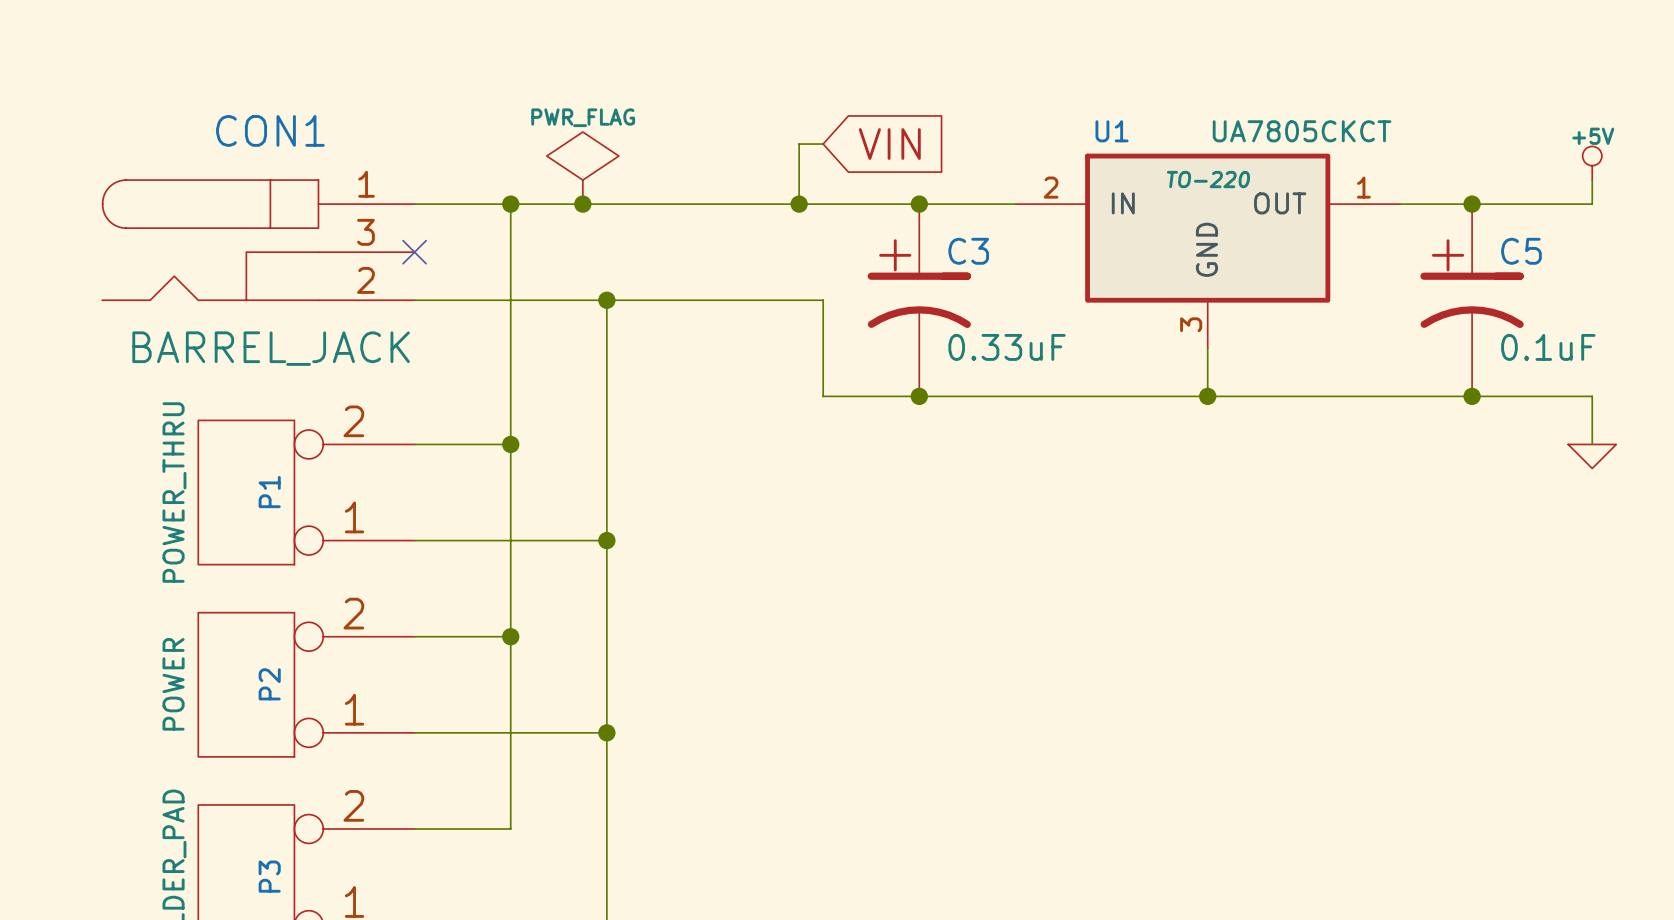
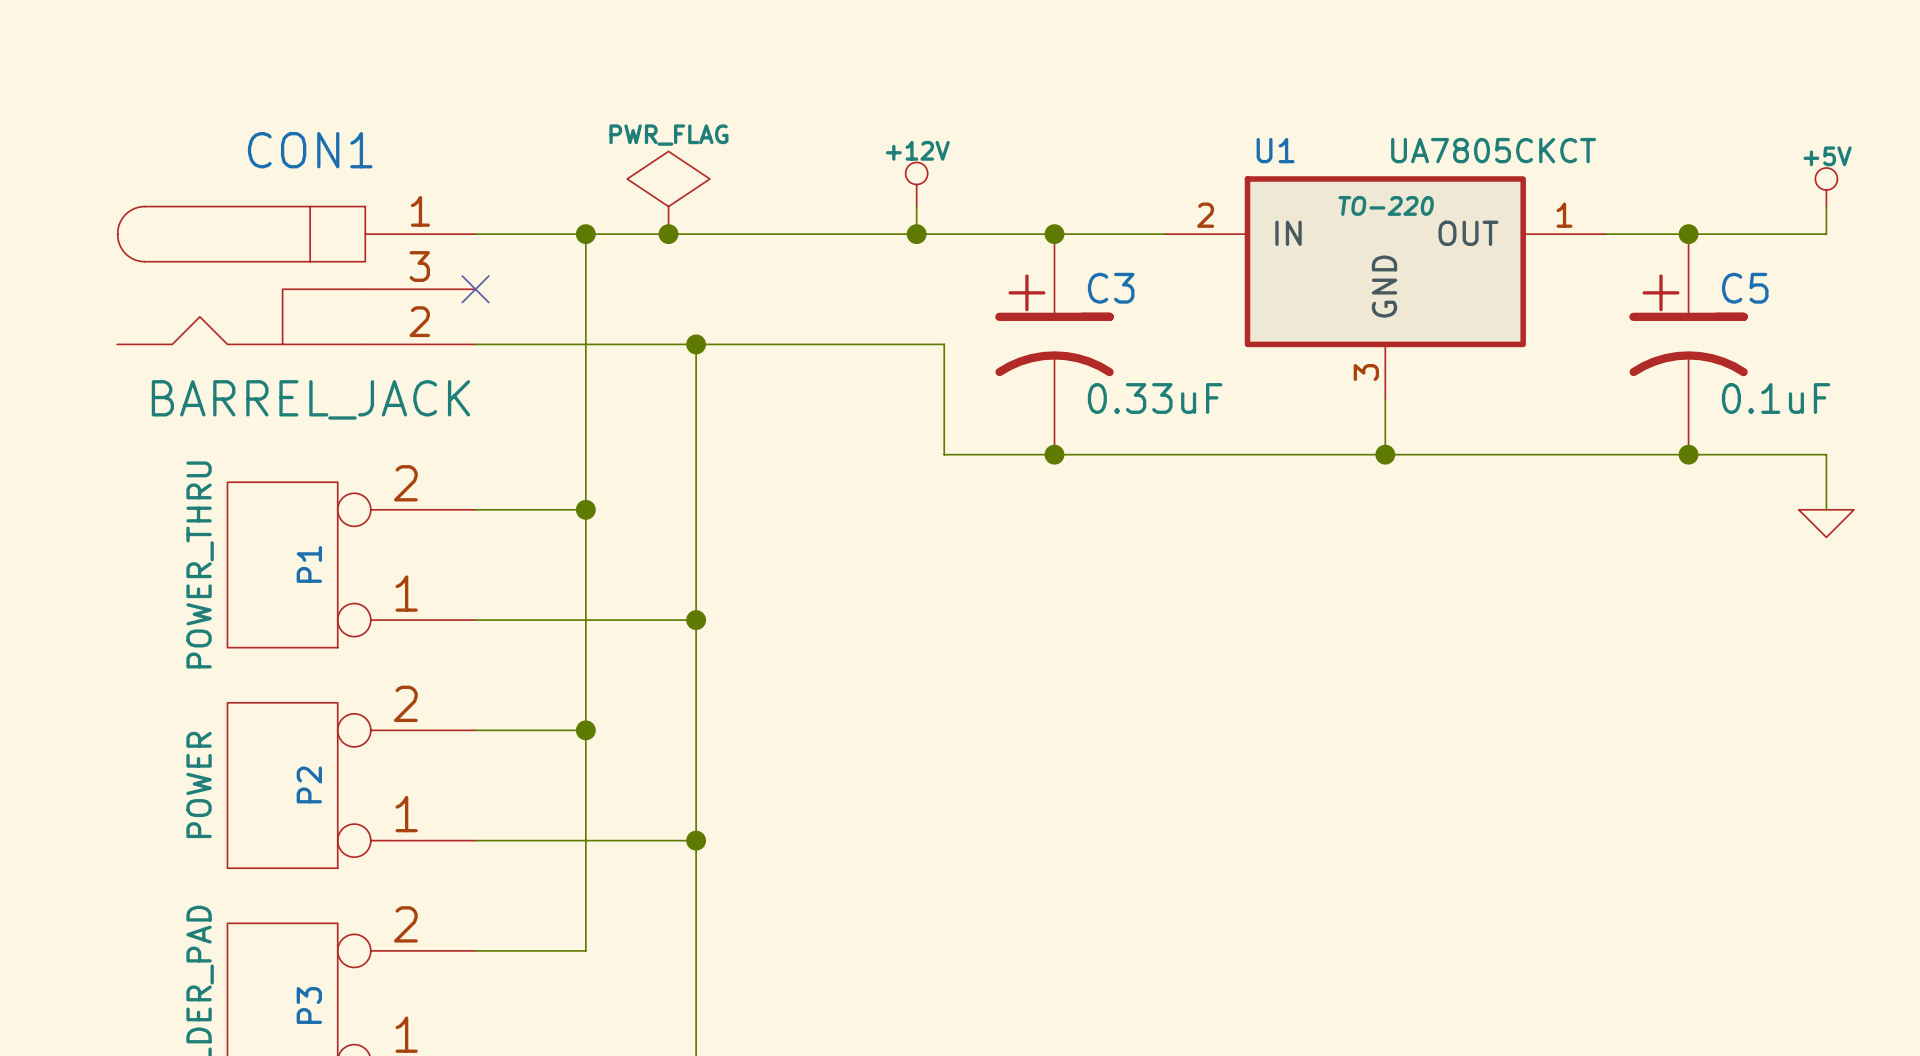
wire: (823, 144) (799, 144) (799, 180) -> none
global label: VIN (889, 144) -> none
power symbol: none -> +12V (916, 184)

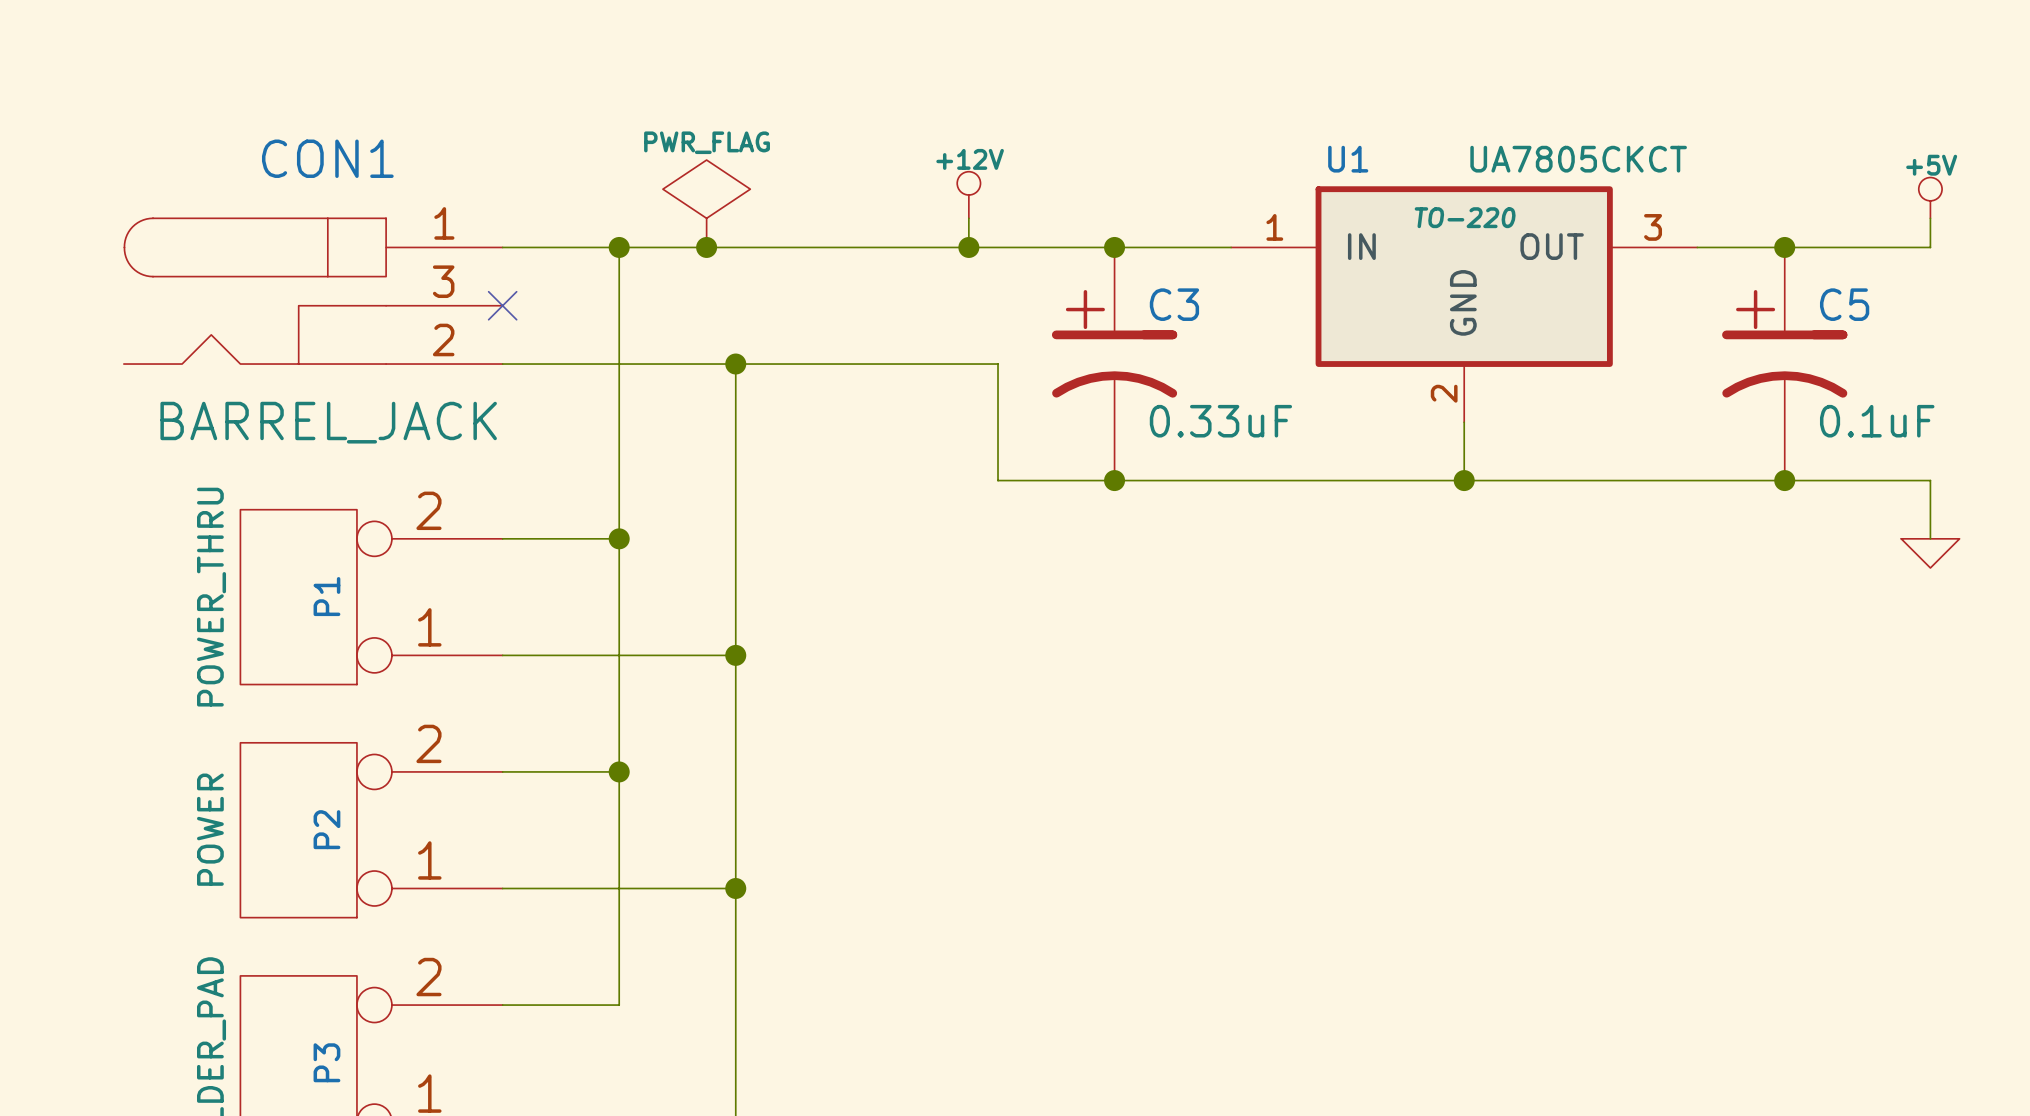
U1 pin number: 2 (1205, 215) -> 1 (1274, 227)
U1 pin number: 1 (1564, 215) -> 3 (1653, 227)
U1 pin number: 3 (1366, 372) -> 2 (1444, 393)

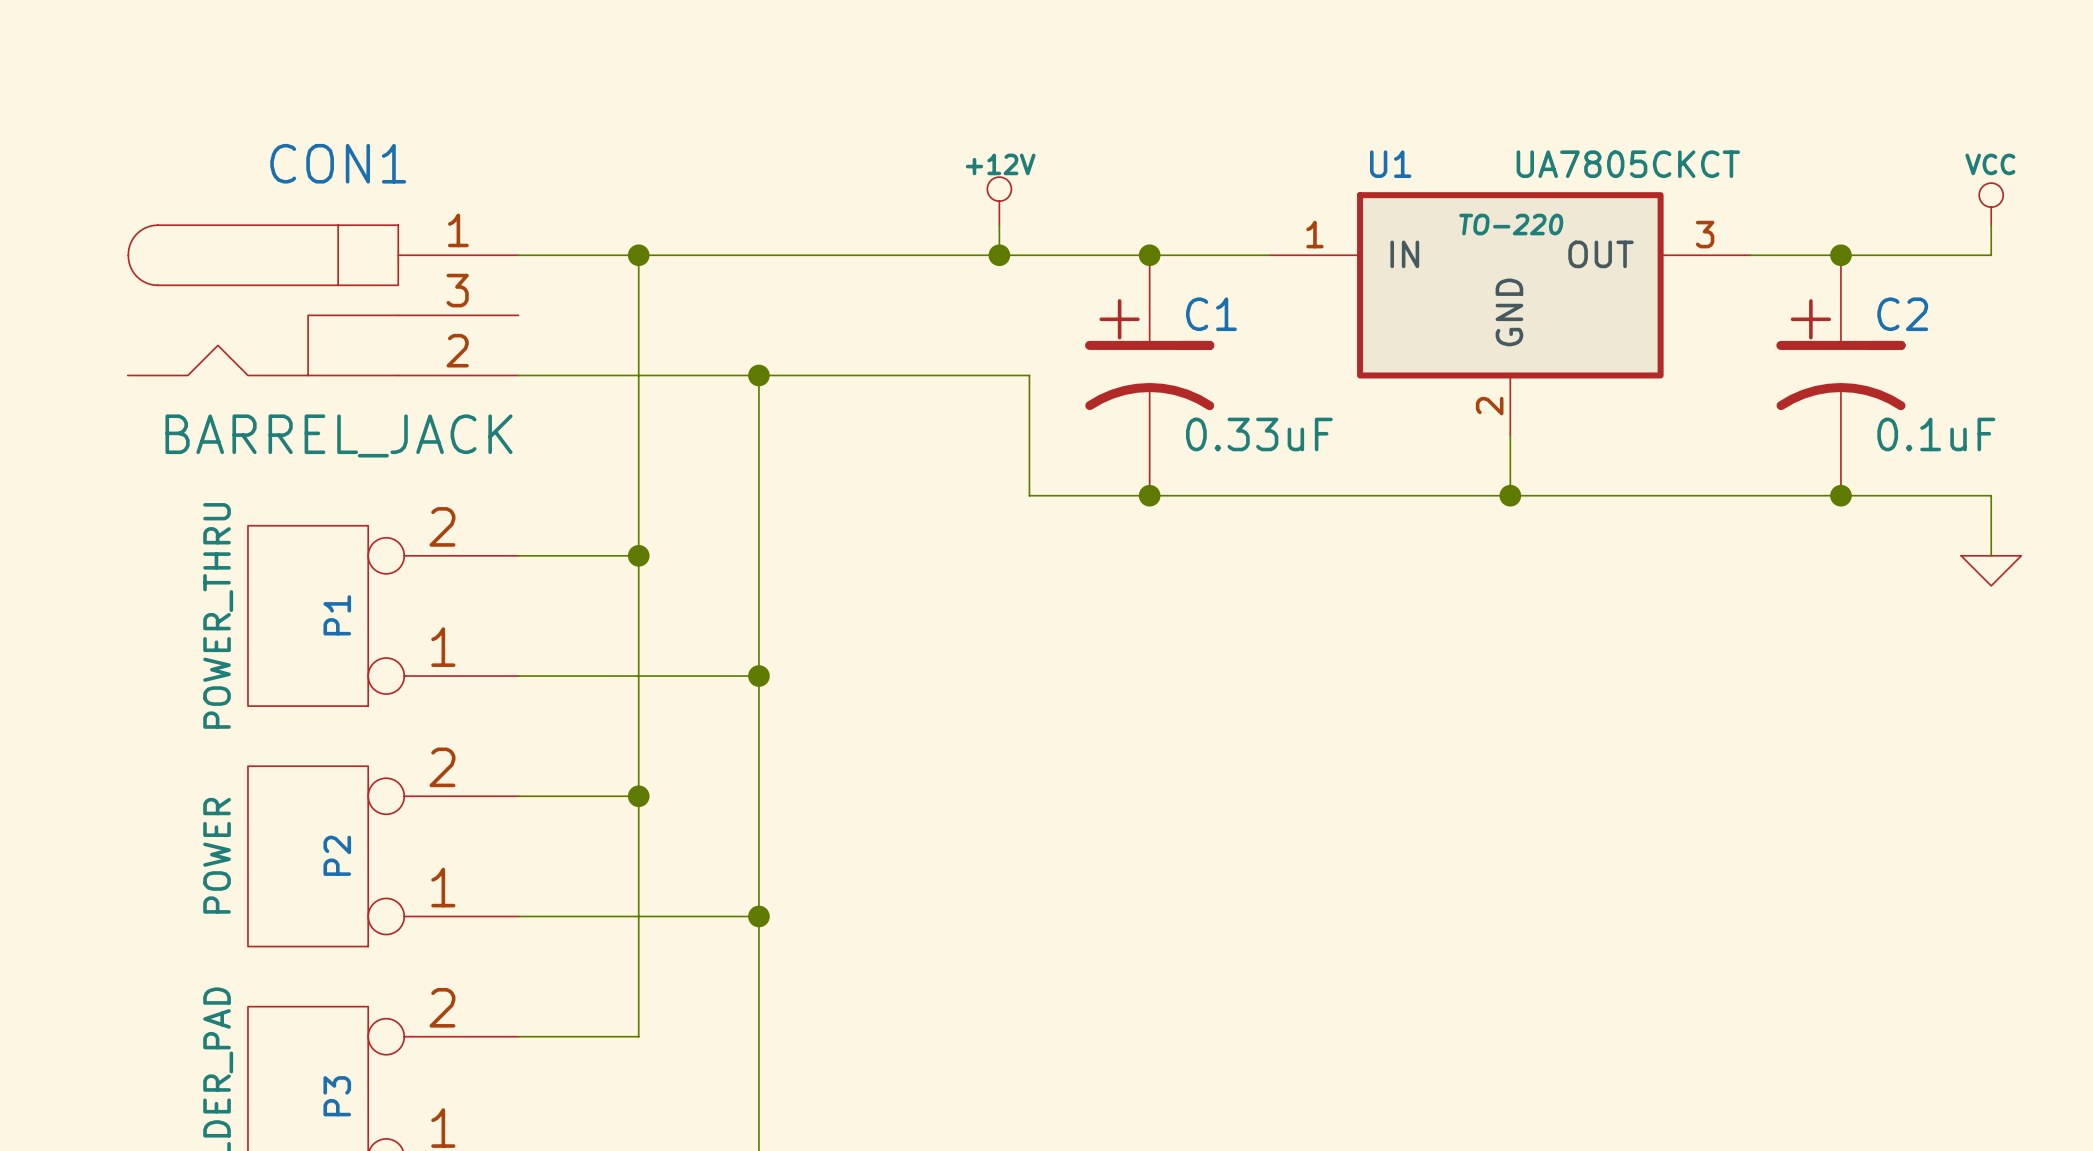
power symbol: +5V (1930, 197) -> VCC (1991, 204)
power symbol: PWR_FLAG (706, 203) -> none
junction: (706, 247) -> none
C3 name: C3 (1174, 304) -> C1 (1211, 314)
C5 name: C5 (1844, 304) -> C2 (1902, 314)
no-connect mark: (502, 305) -> none

